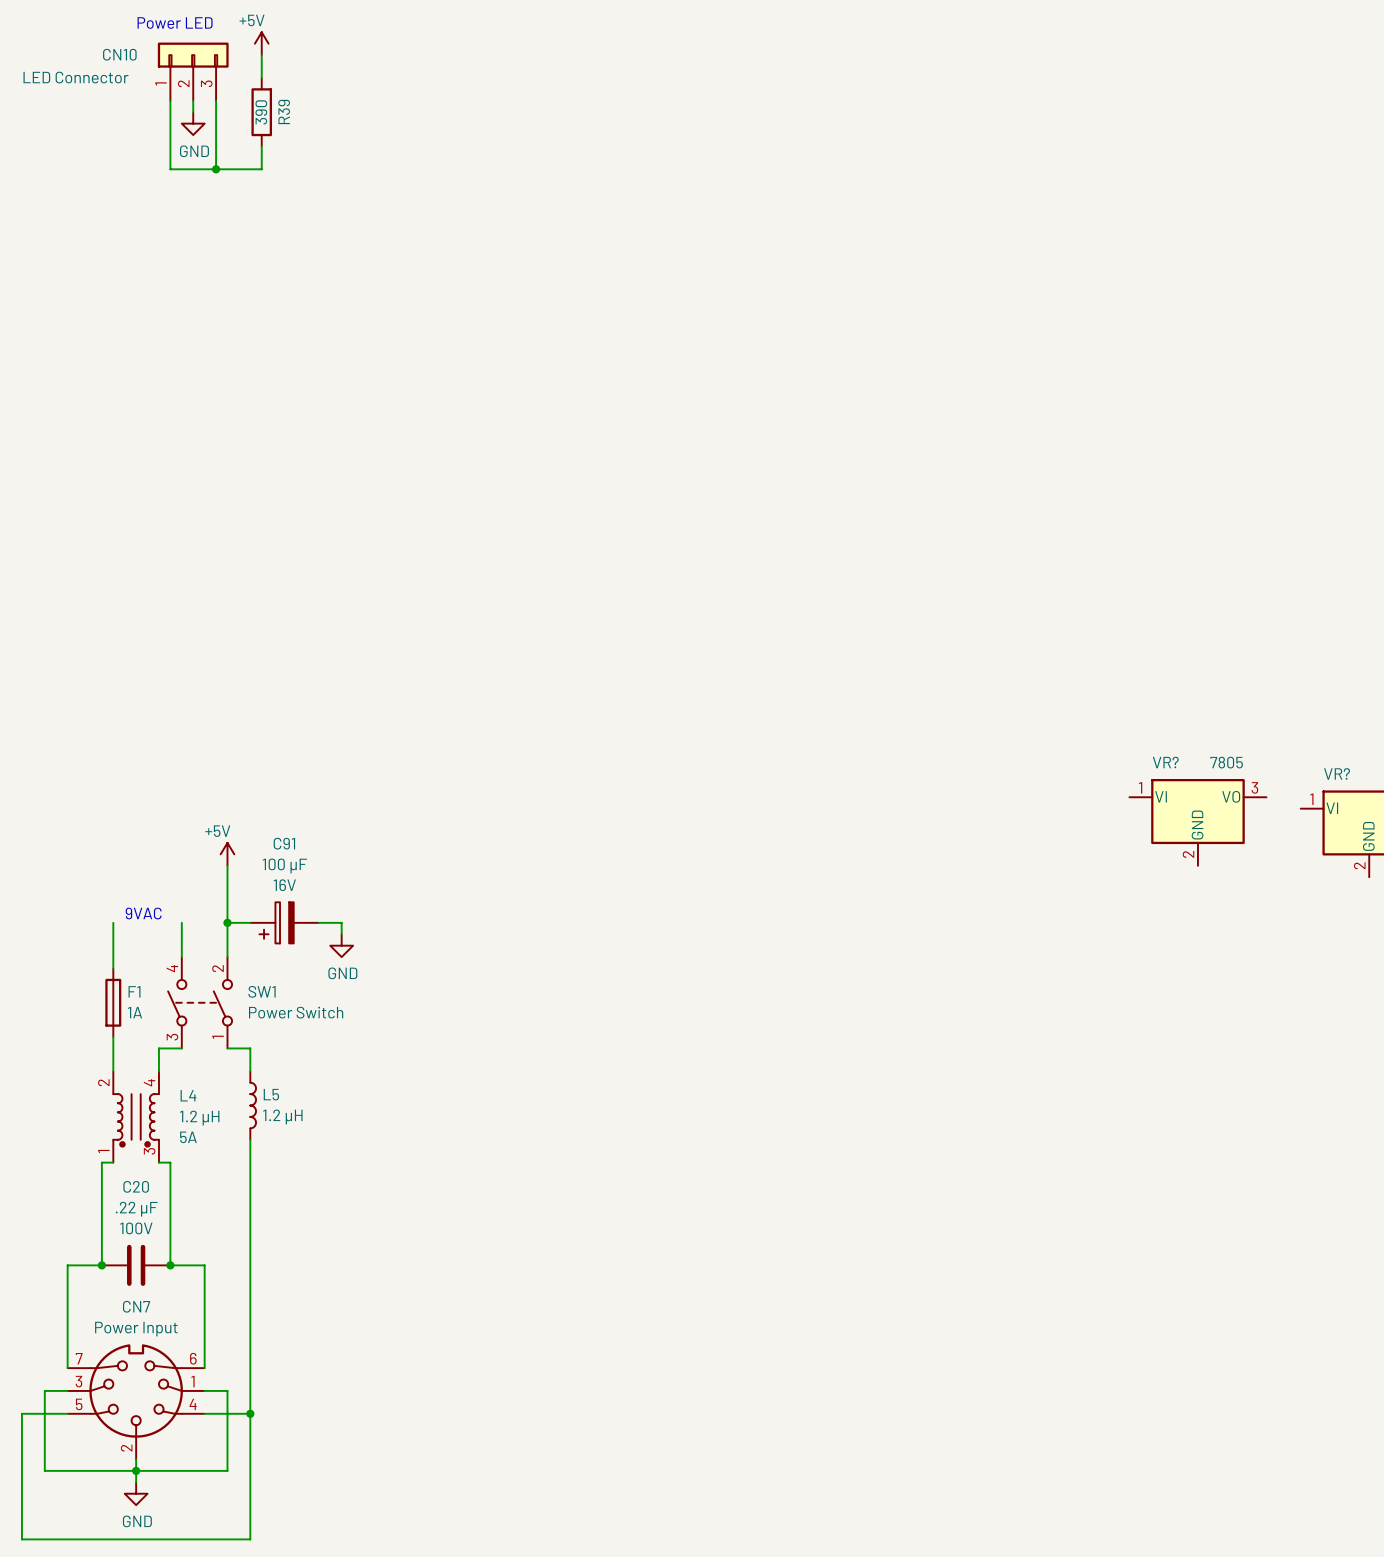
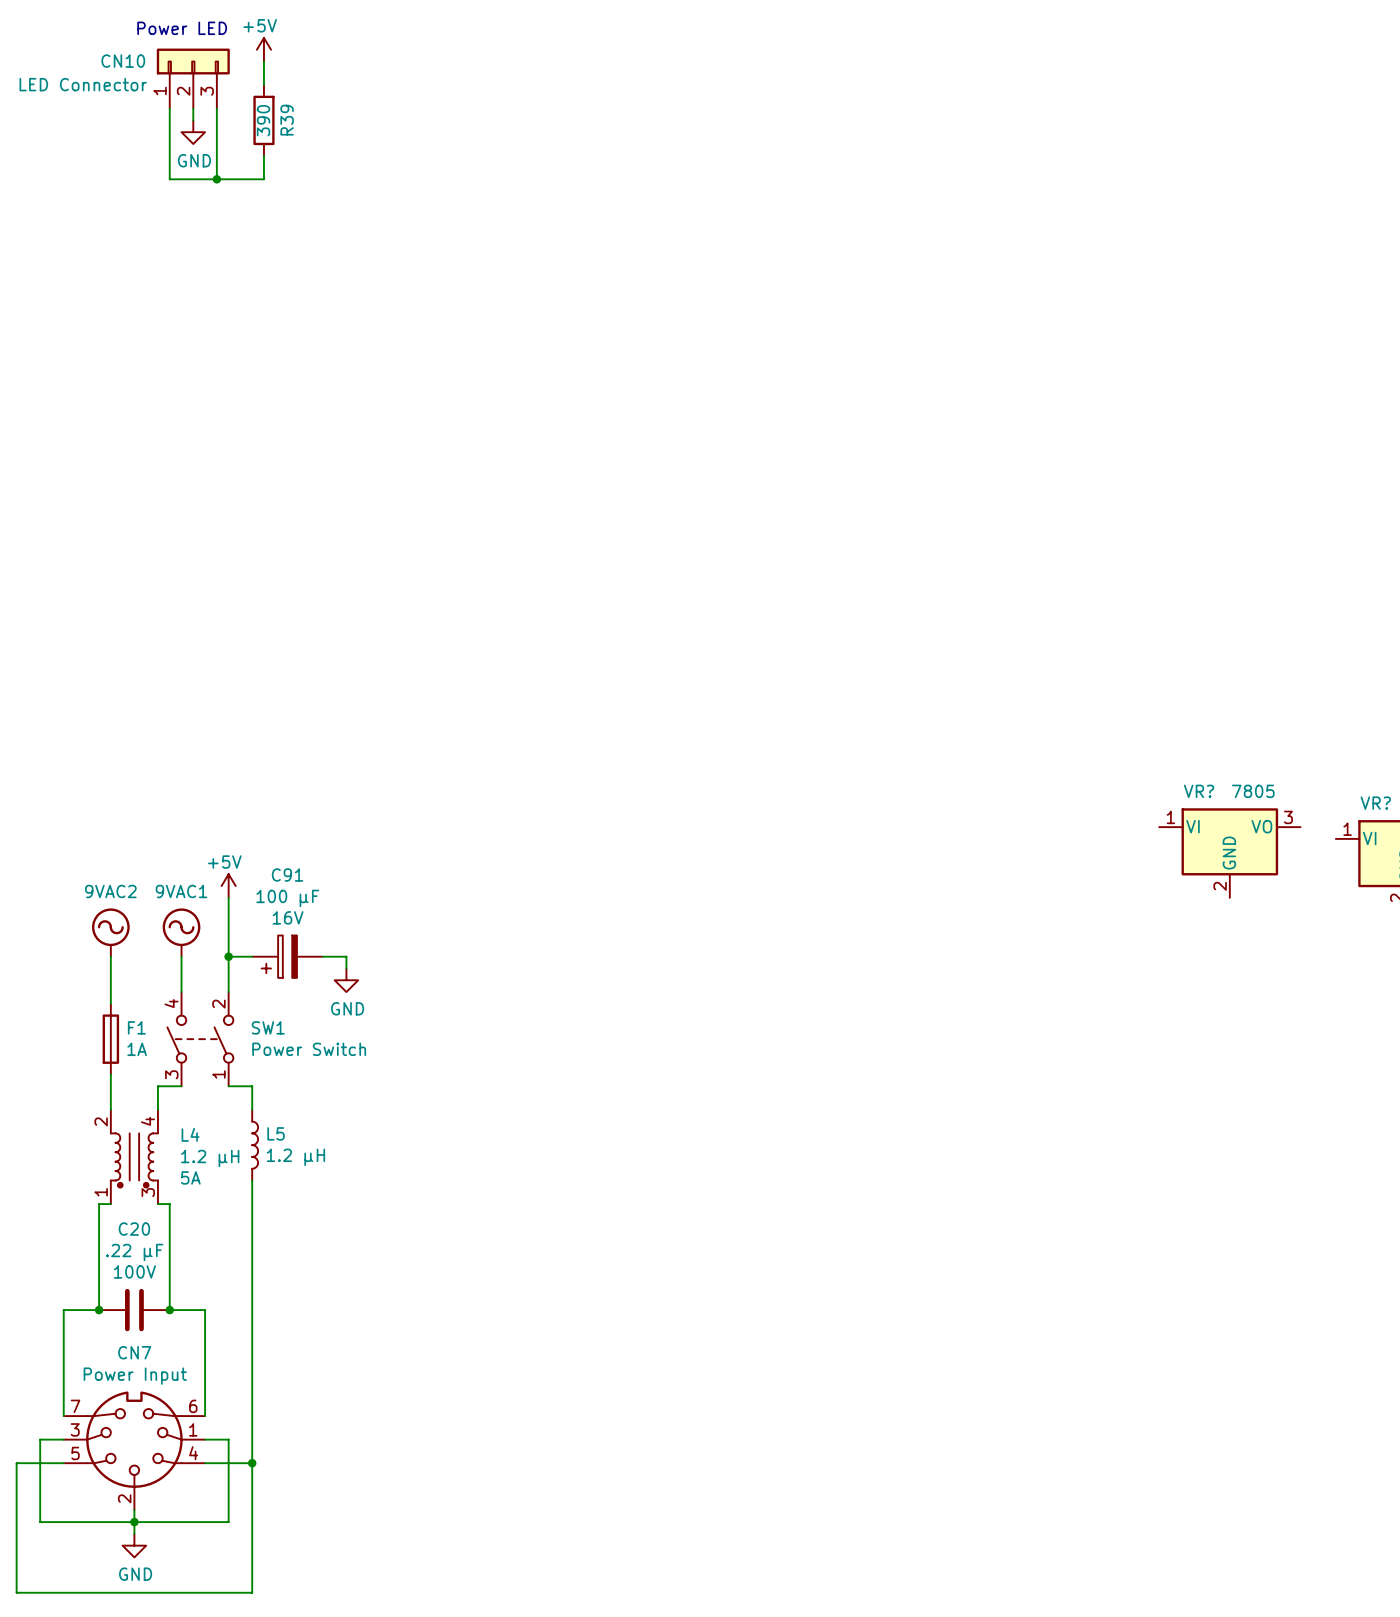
power symbol: none -> 9VAC2 (110, 932)
power symbol: none -> 9VAC1 (181, 932)
text: 9VAC (143, 913) -> none

